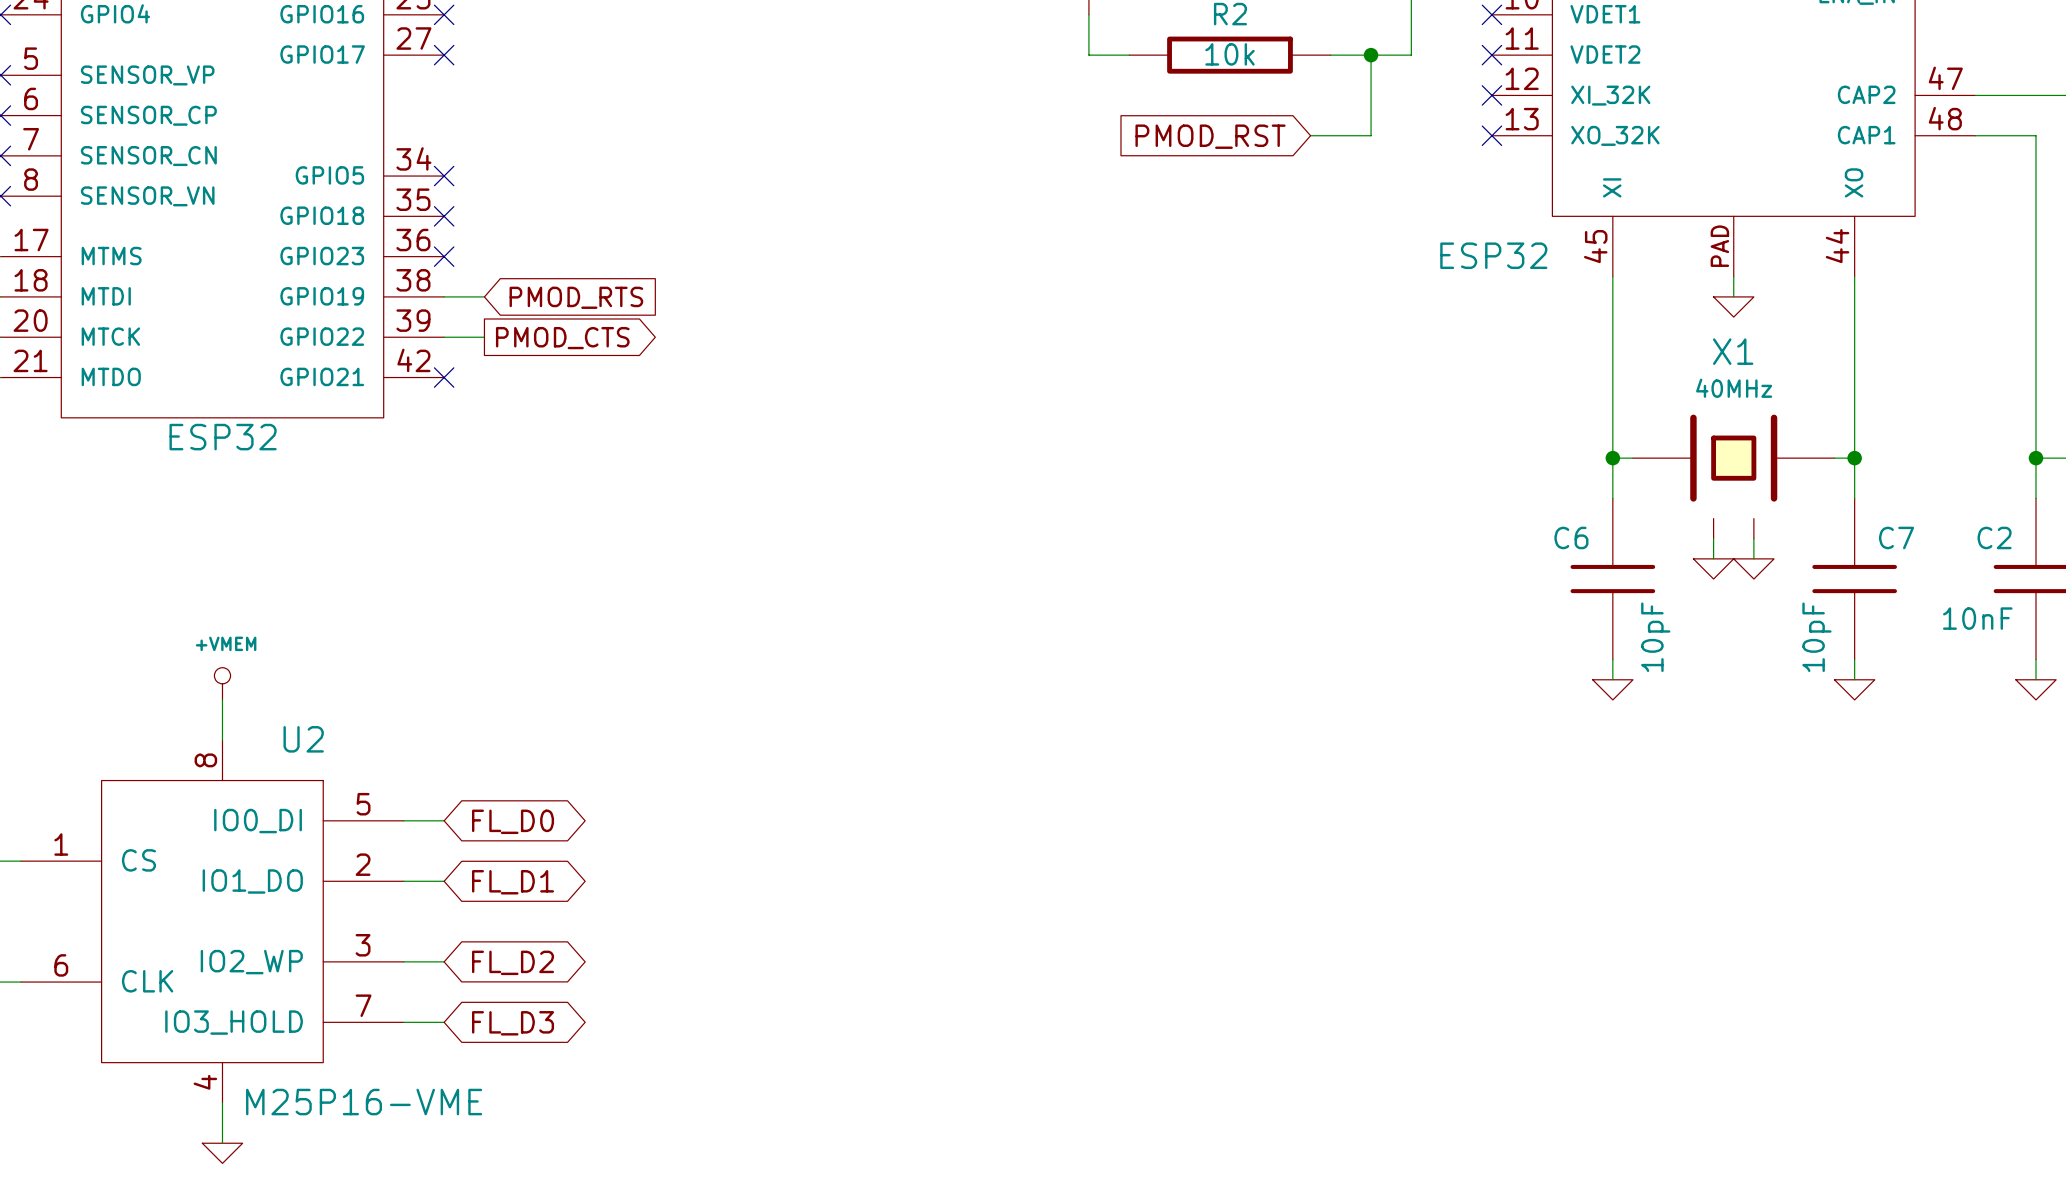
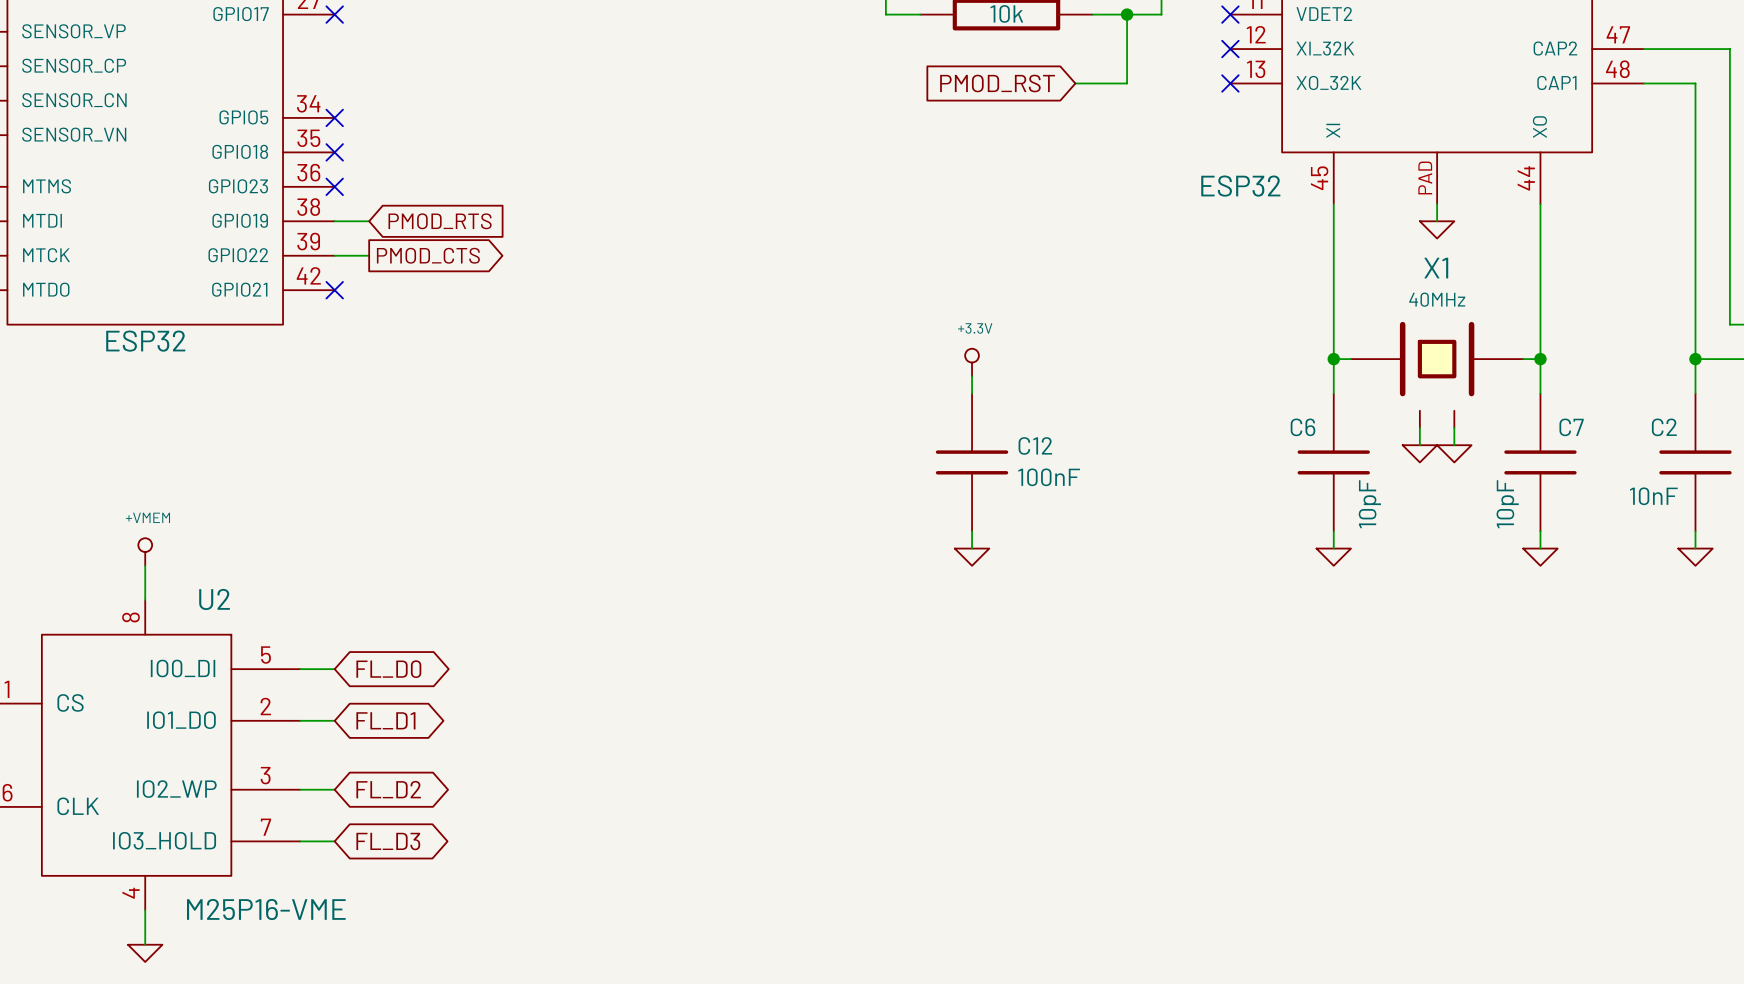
power symbol: none -> +3.3V (972, 362)
wire: none -> (972, 376) (972, 393)
C12: none -> 100nF (972, 462)
wire: none -> (972, 531) (972, 548)
power symbol: none -> (972, 557)

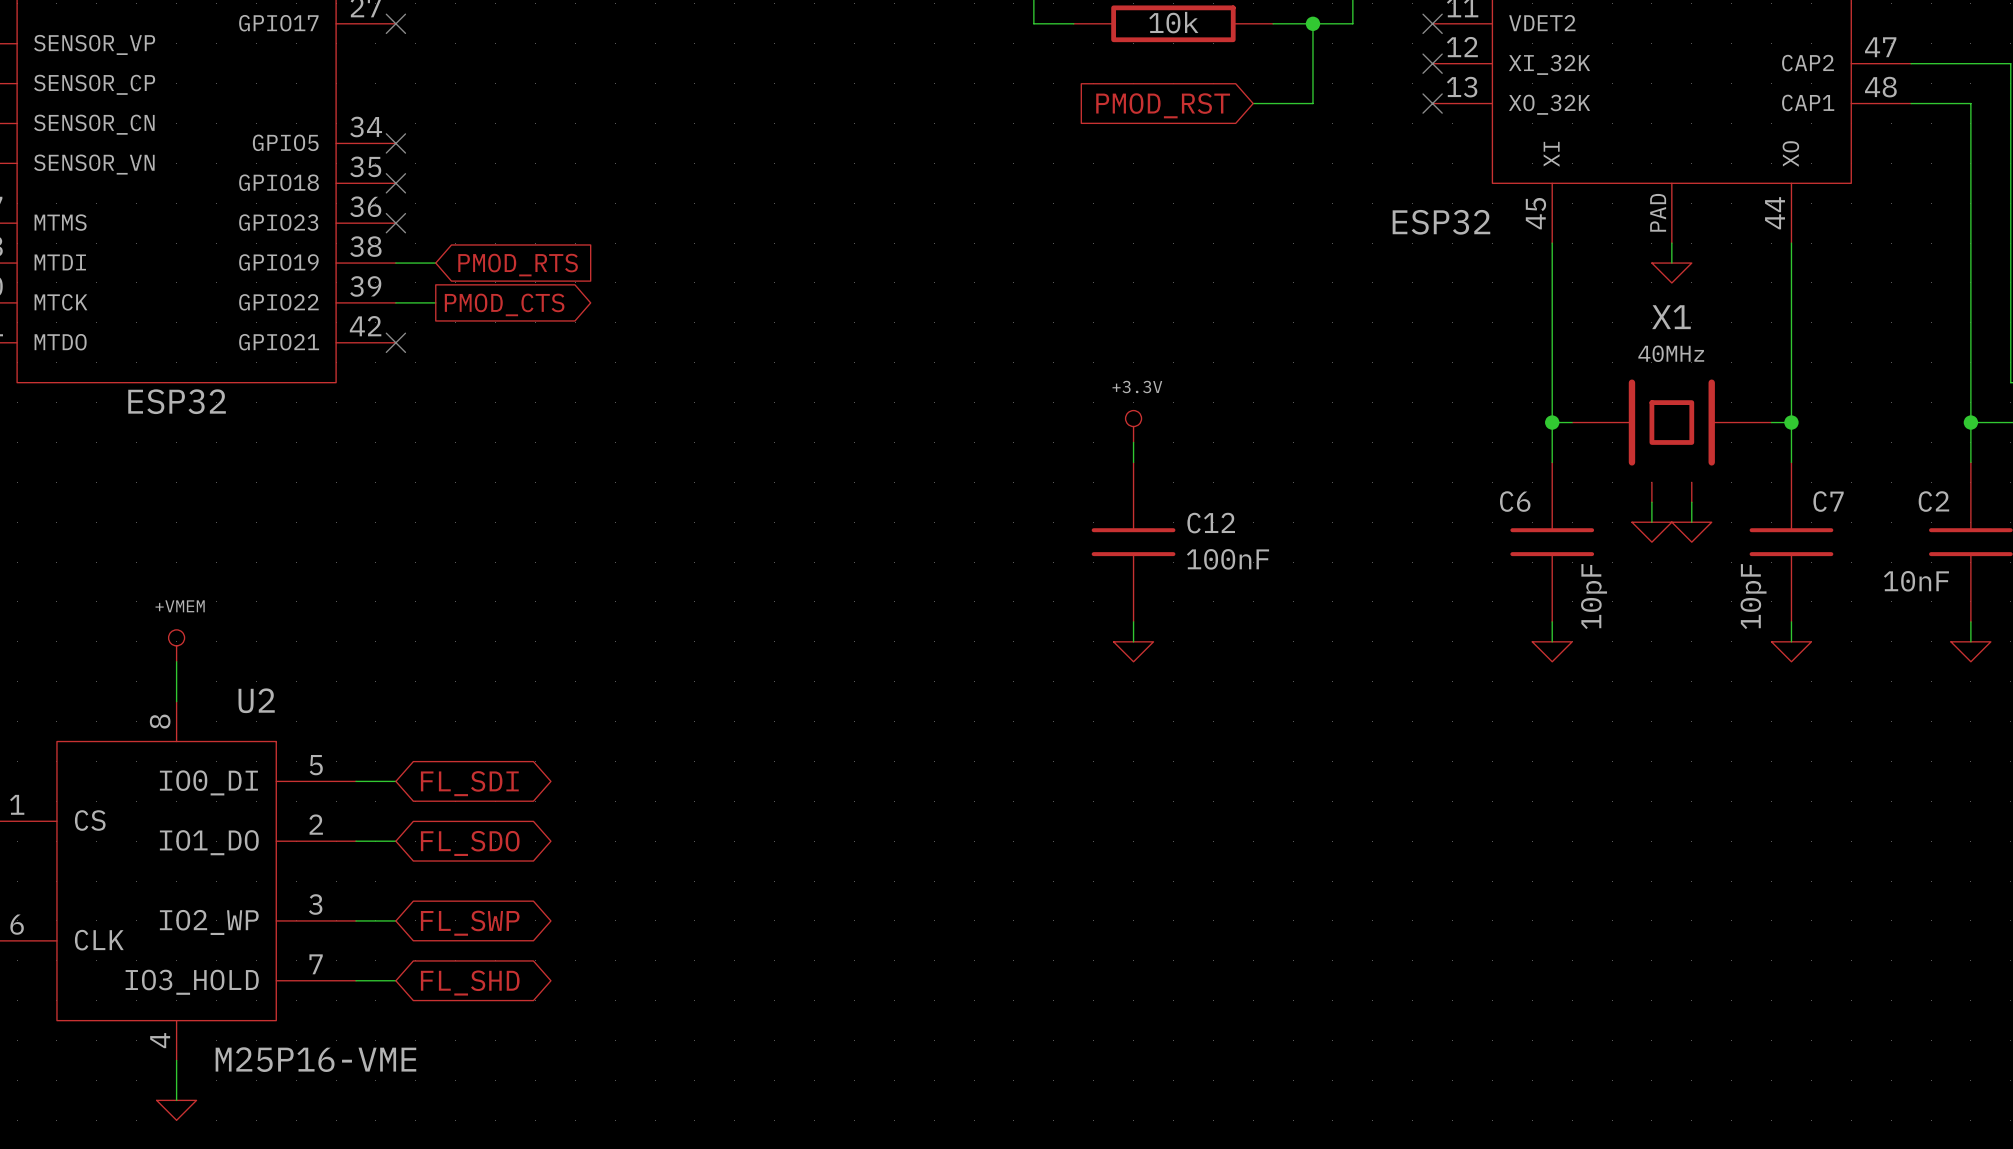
global label: FL_D0 (388, 669) -> FL_SDI (469, 783)
global label: FL_D1 (385, 720) -> FL_SDO (470, 843)
global label: FL_D2 (388, 789) -> FL_SWP (470, 923)
global label: FL_D3 (388, 841) -> FL_SHD (470, 983)

